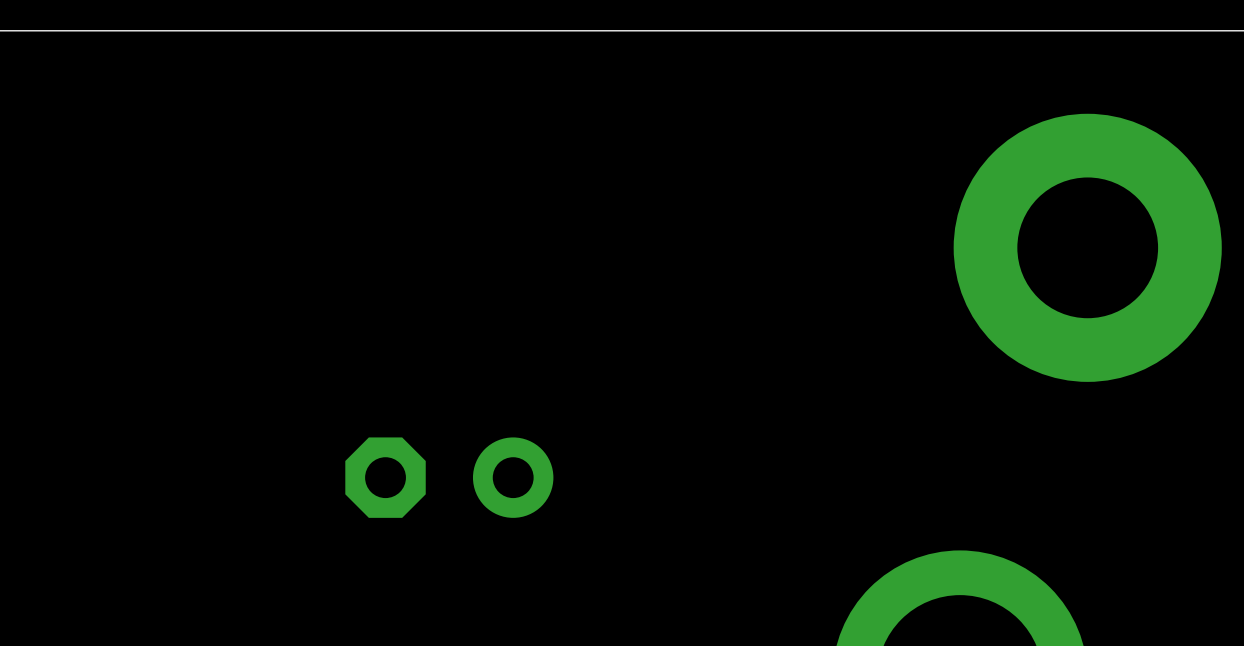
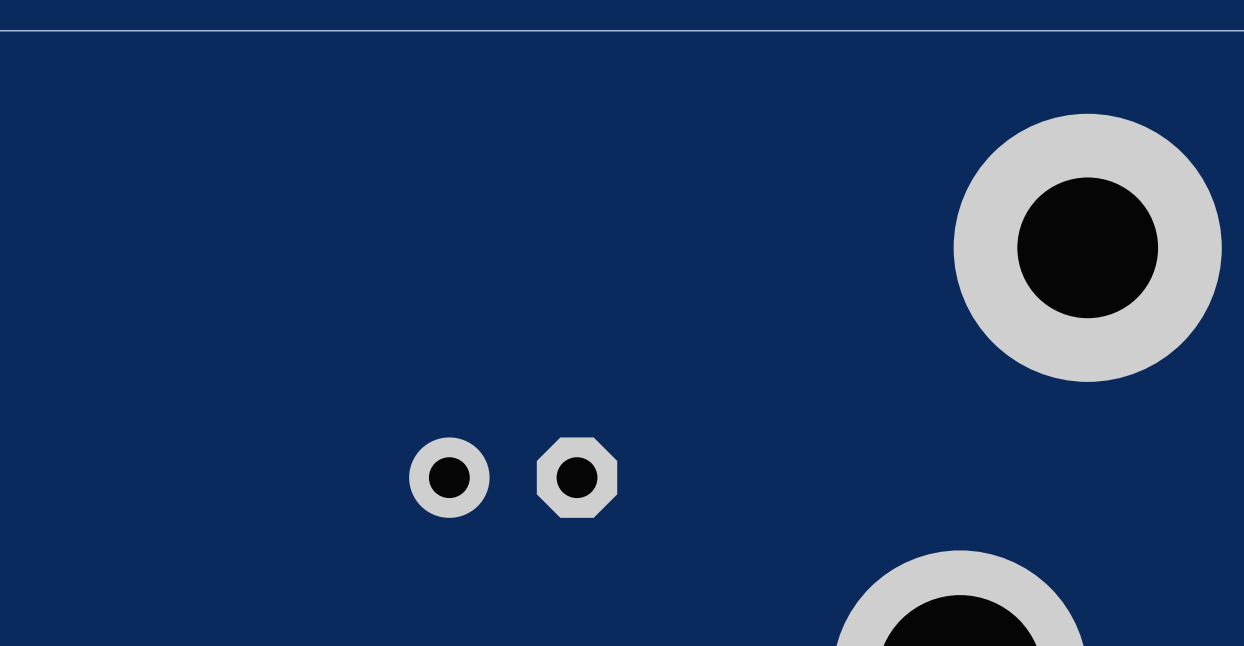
part rotation: 0° (449, 477) -> 180° (513, 477)

